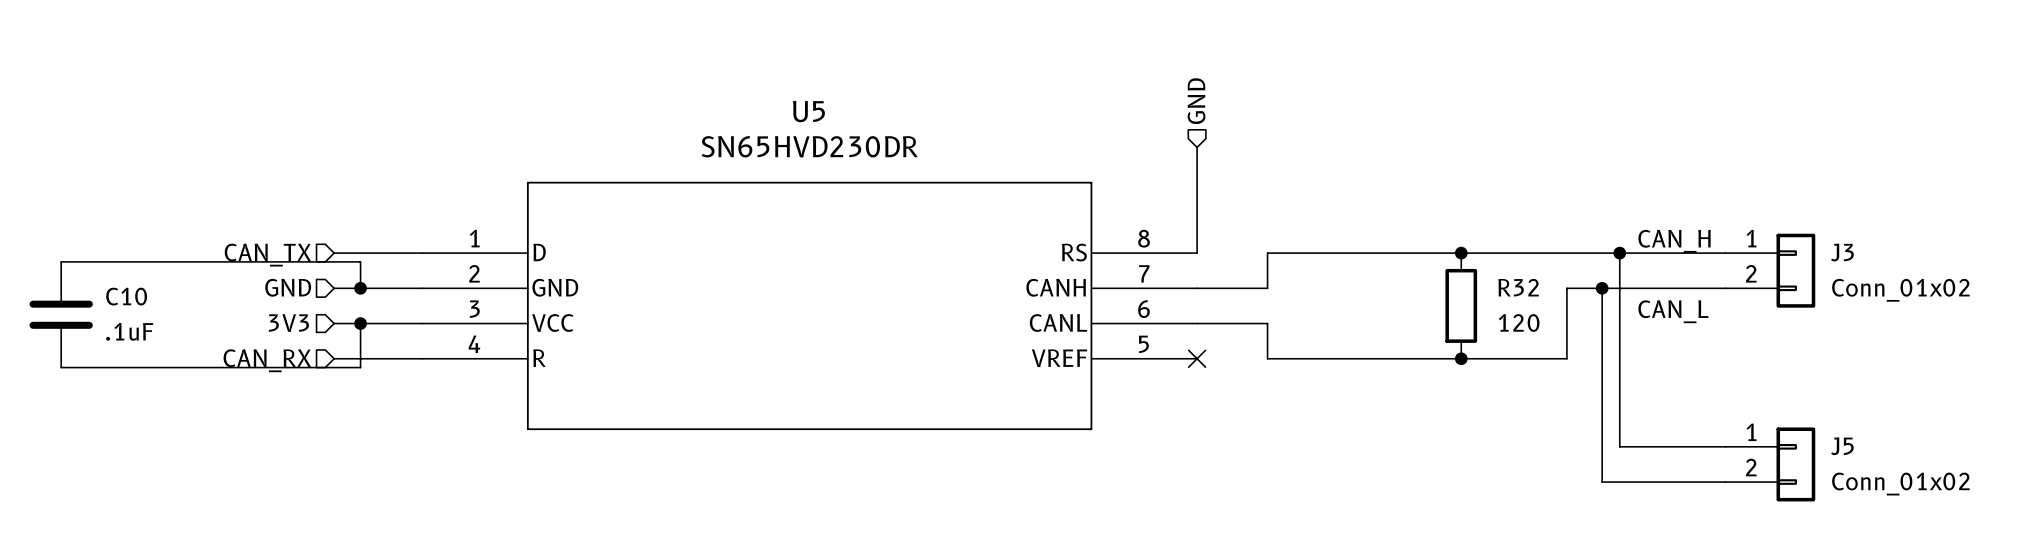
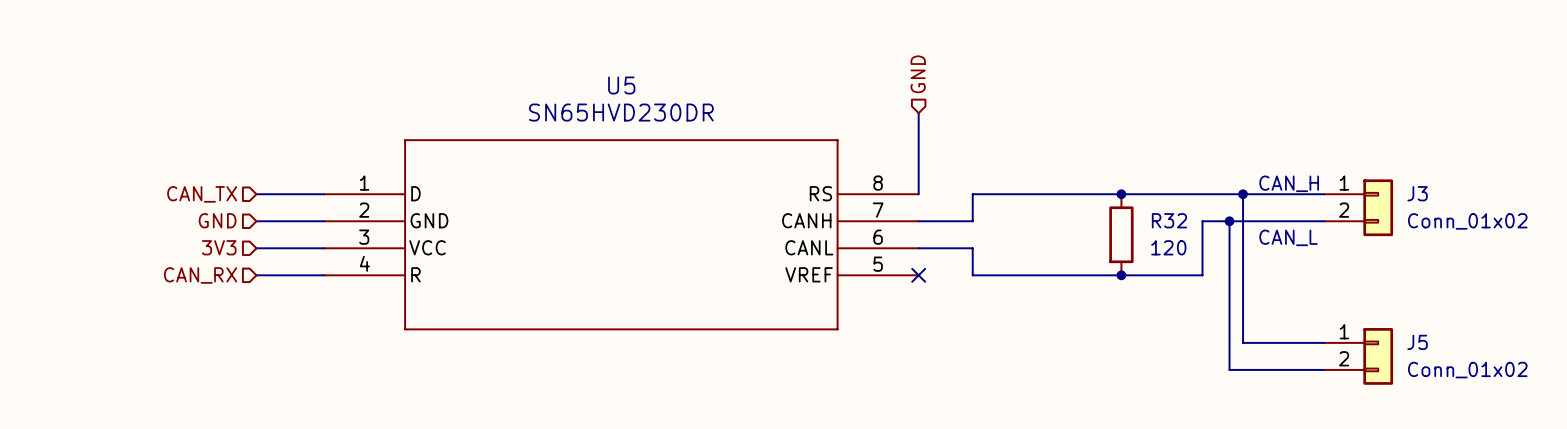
wire: (61, 261) (360, 261) (360, 288) -> none
junction: (360, 288) -> none
C10: .1uF (61, 314) -> none
wire: (360, 323) (360, 367) (61, 367) -> none
junction: (360, 323) -> none

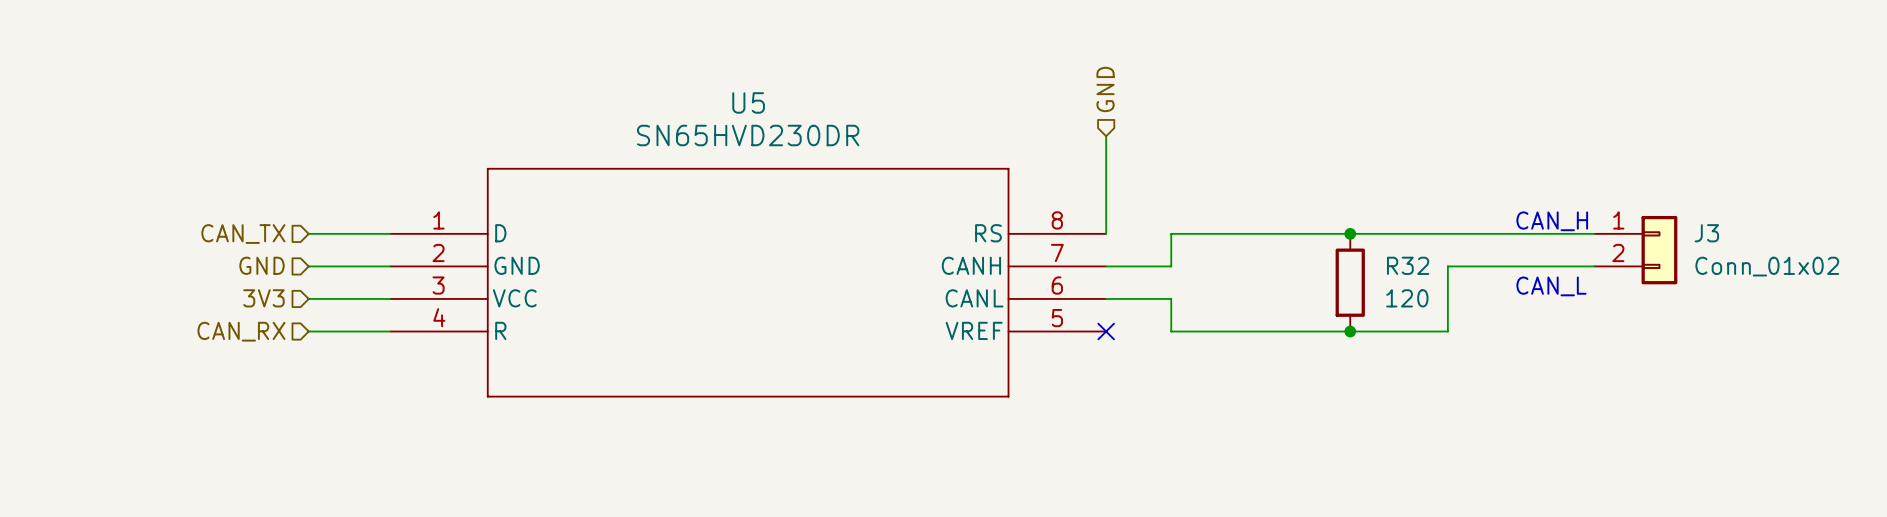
wire: (1243, 194) (1243, 342) (1324, 342) -> none
junction: (1243, 194) -> none
wire: (1229, 221) (1229, 369) (1324, 369) -> none
junction: (1229, 221) -> none
J5: Conn_01x02 (1358, 356) -> none

